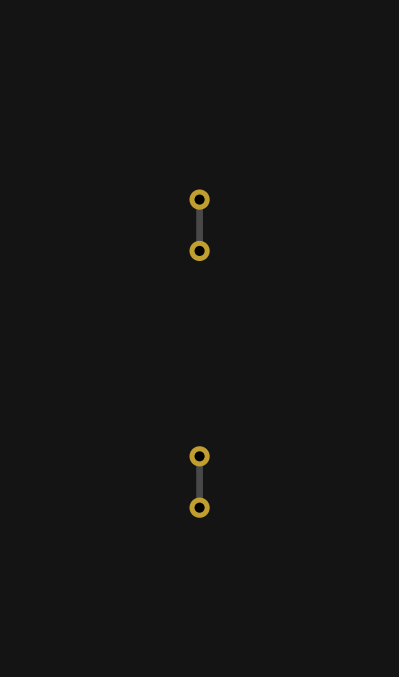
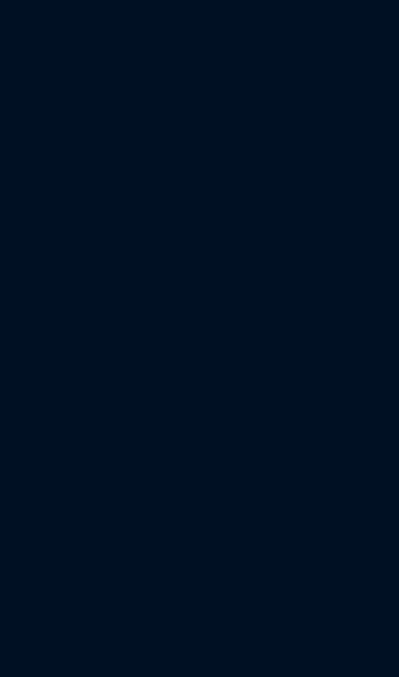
track: (199, 199) (199, 250) -> none
via: (199, 199) -> none
via: (199, 250) -> none
track: (199, 456) (199, 507) -> none
via: (199, 456) -> none
via: (199, 507) -> none

